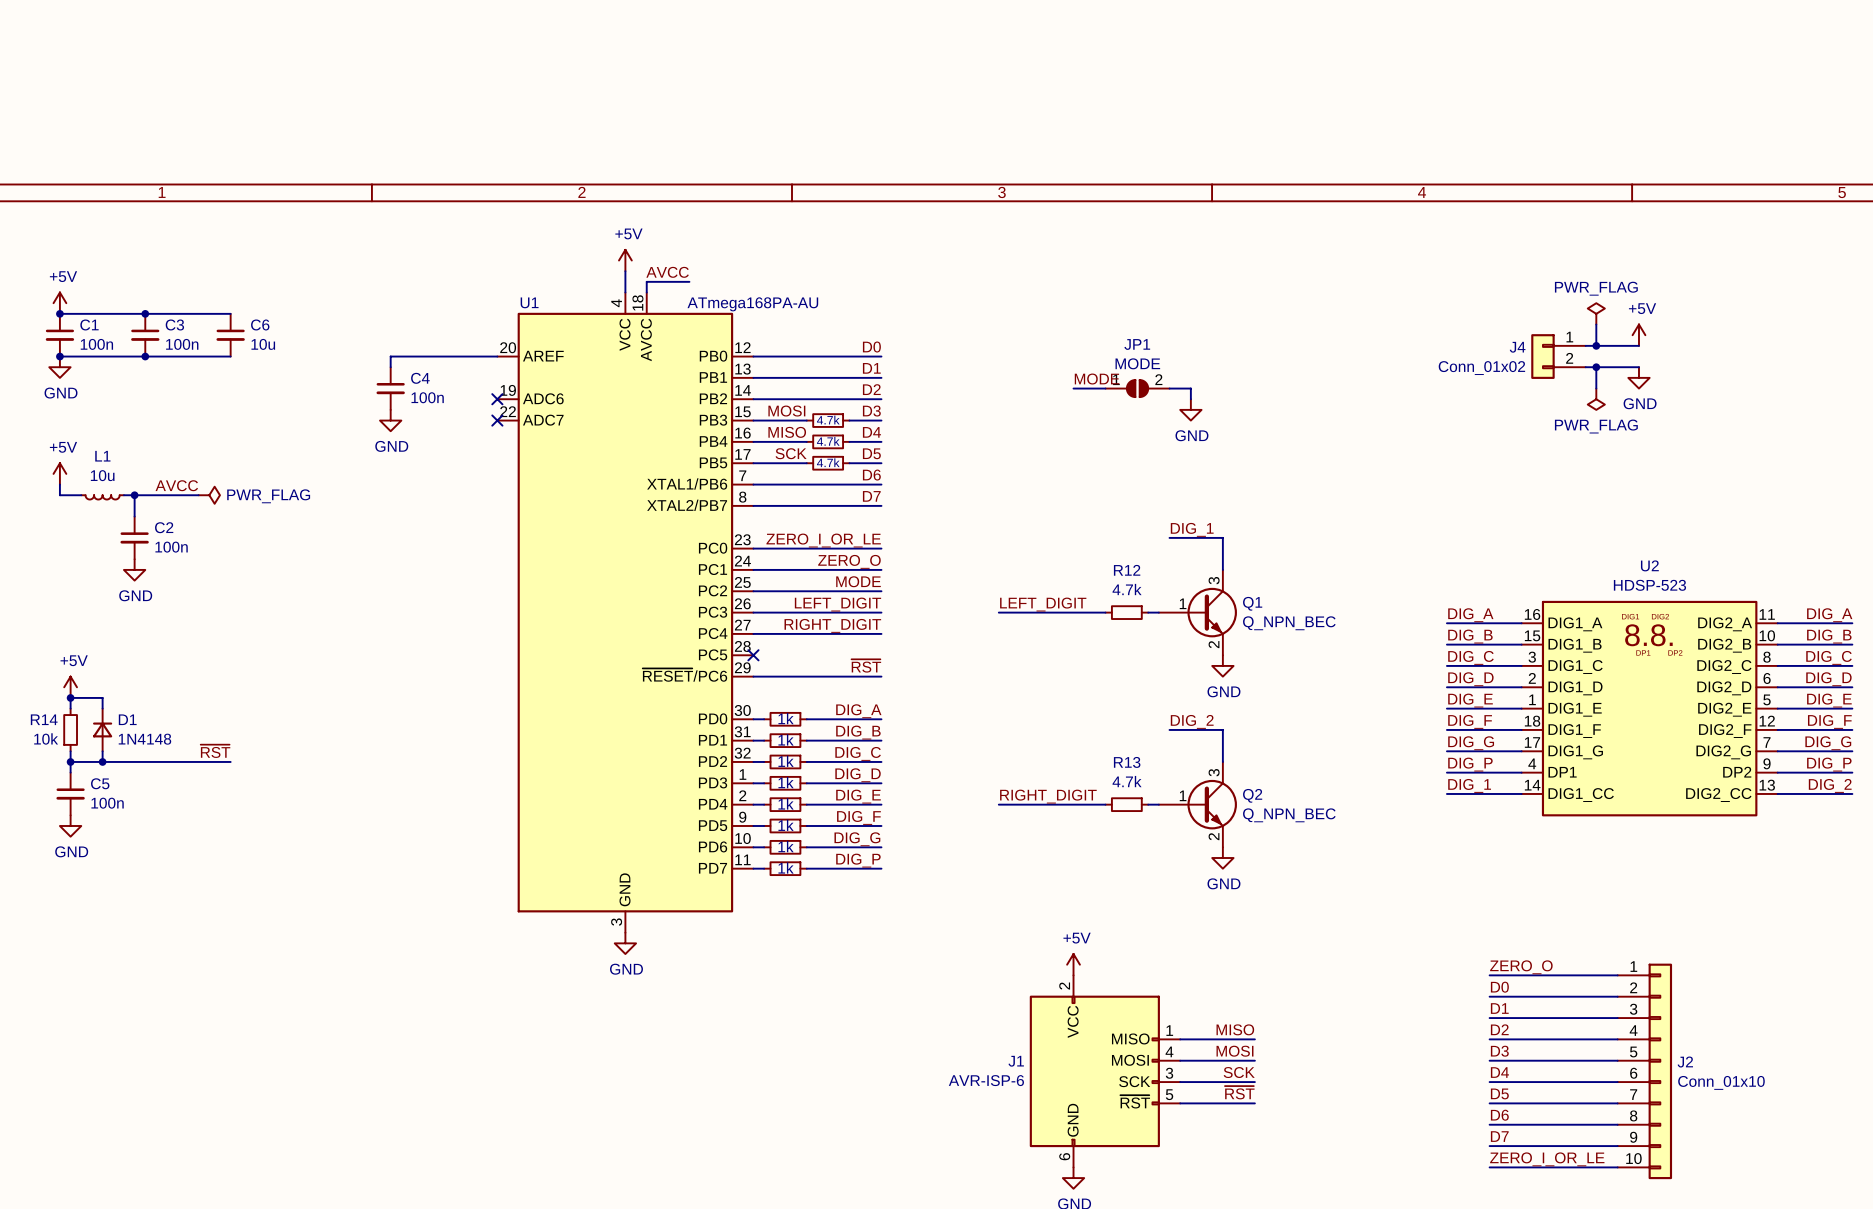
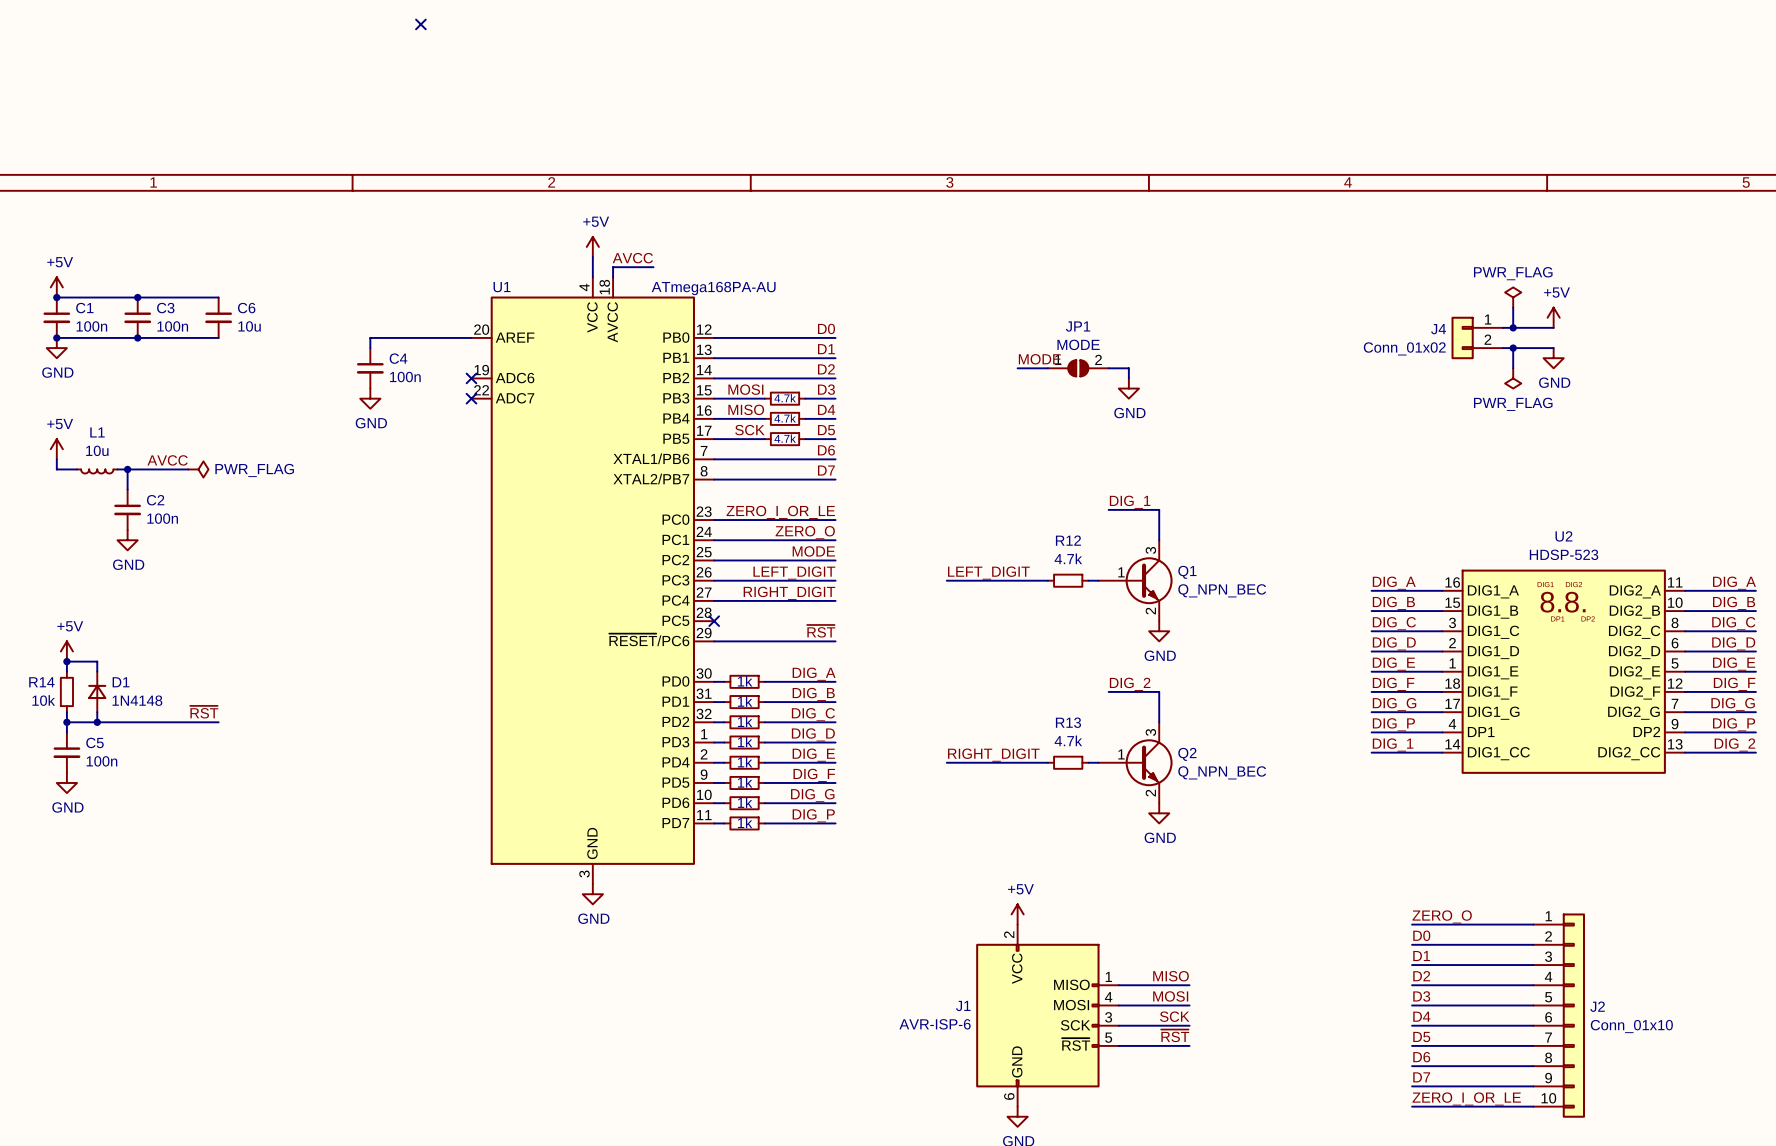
no-connect mark: none -> (420, 24)

